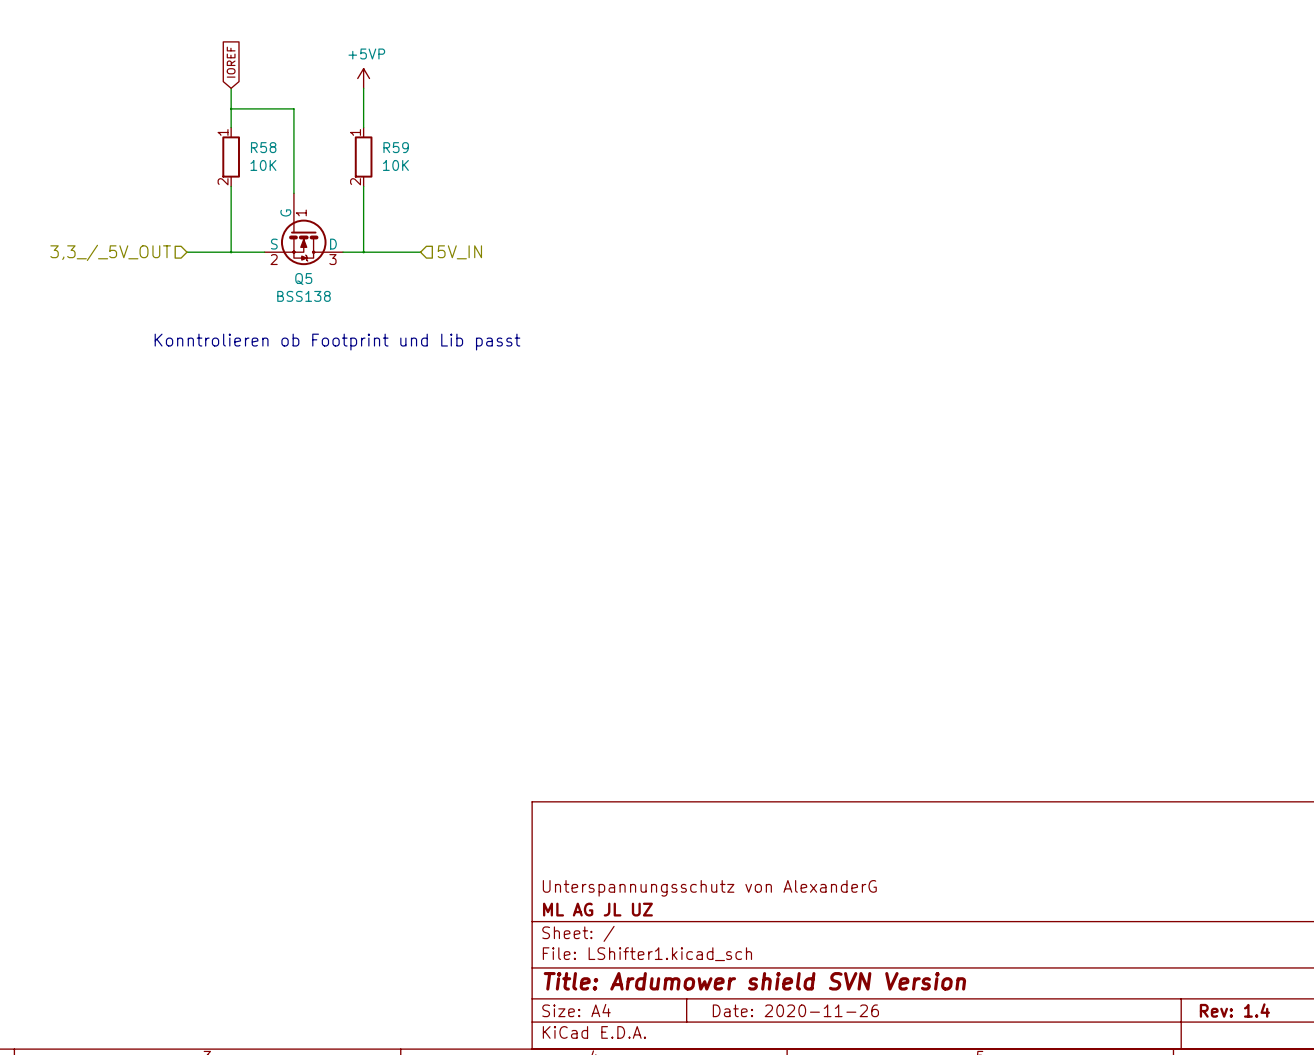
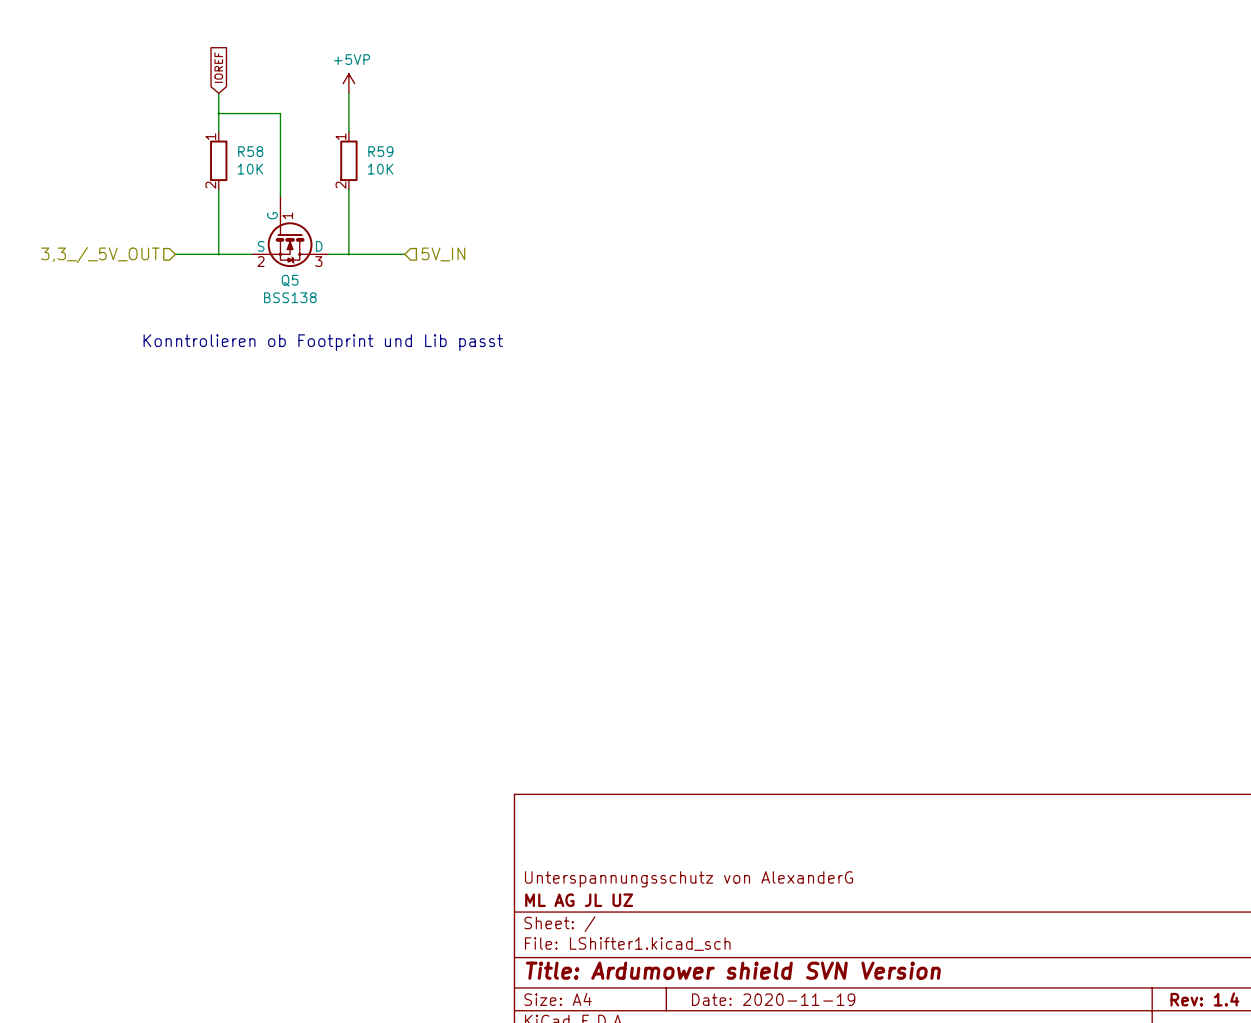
title block: Date: 2020-11-26 (795, 1010) -> Date: 2020-11-19 (773, 999)

